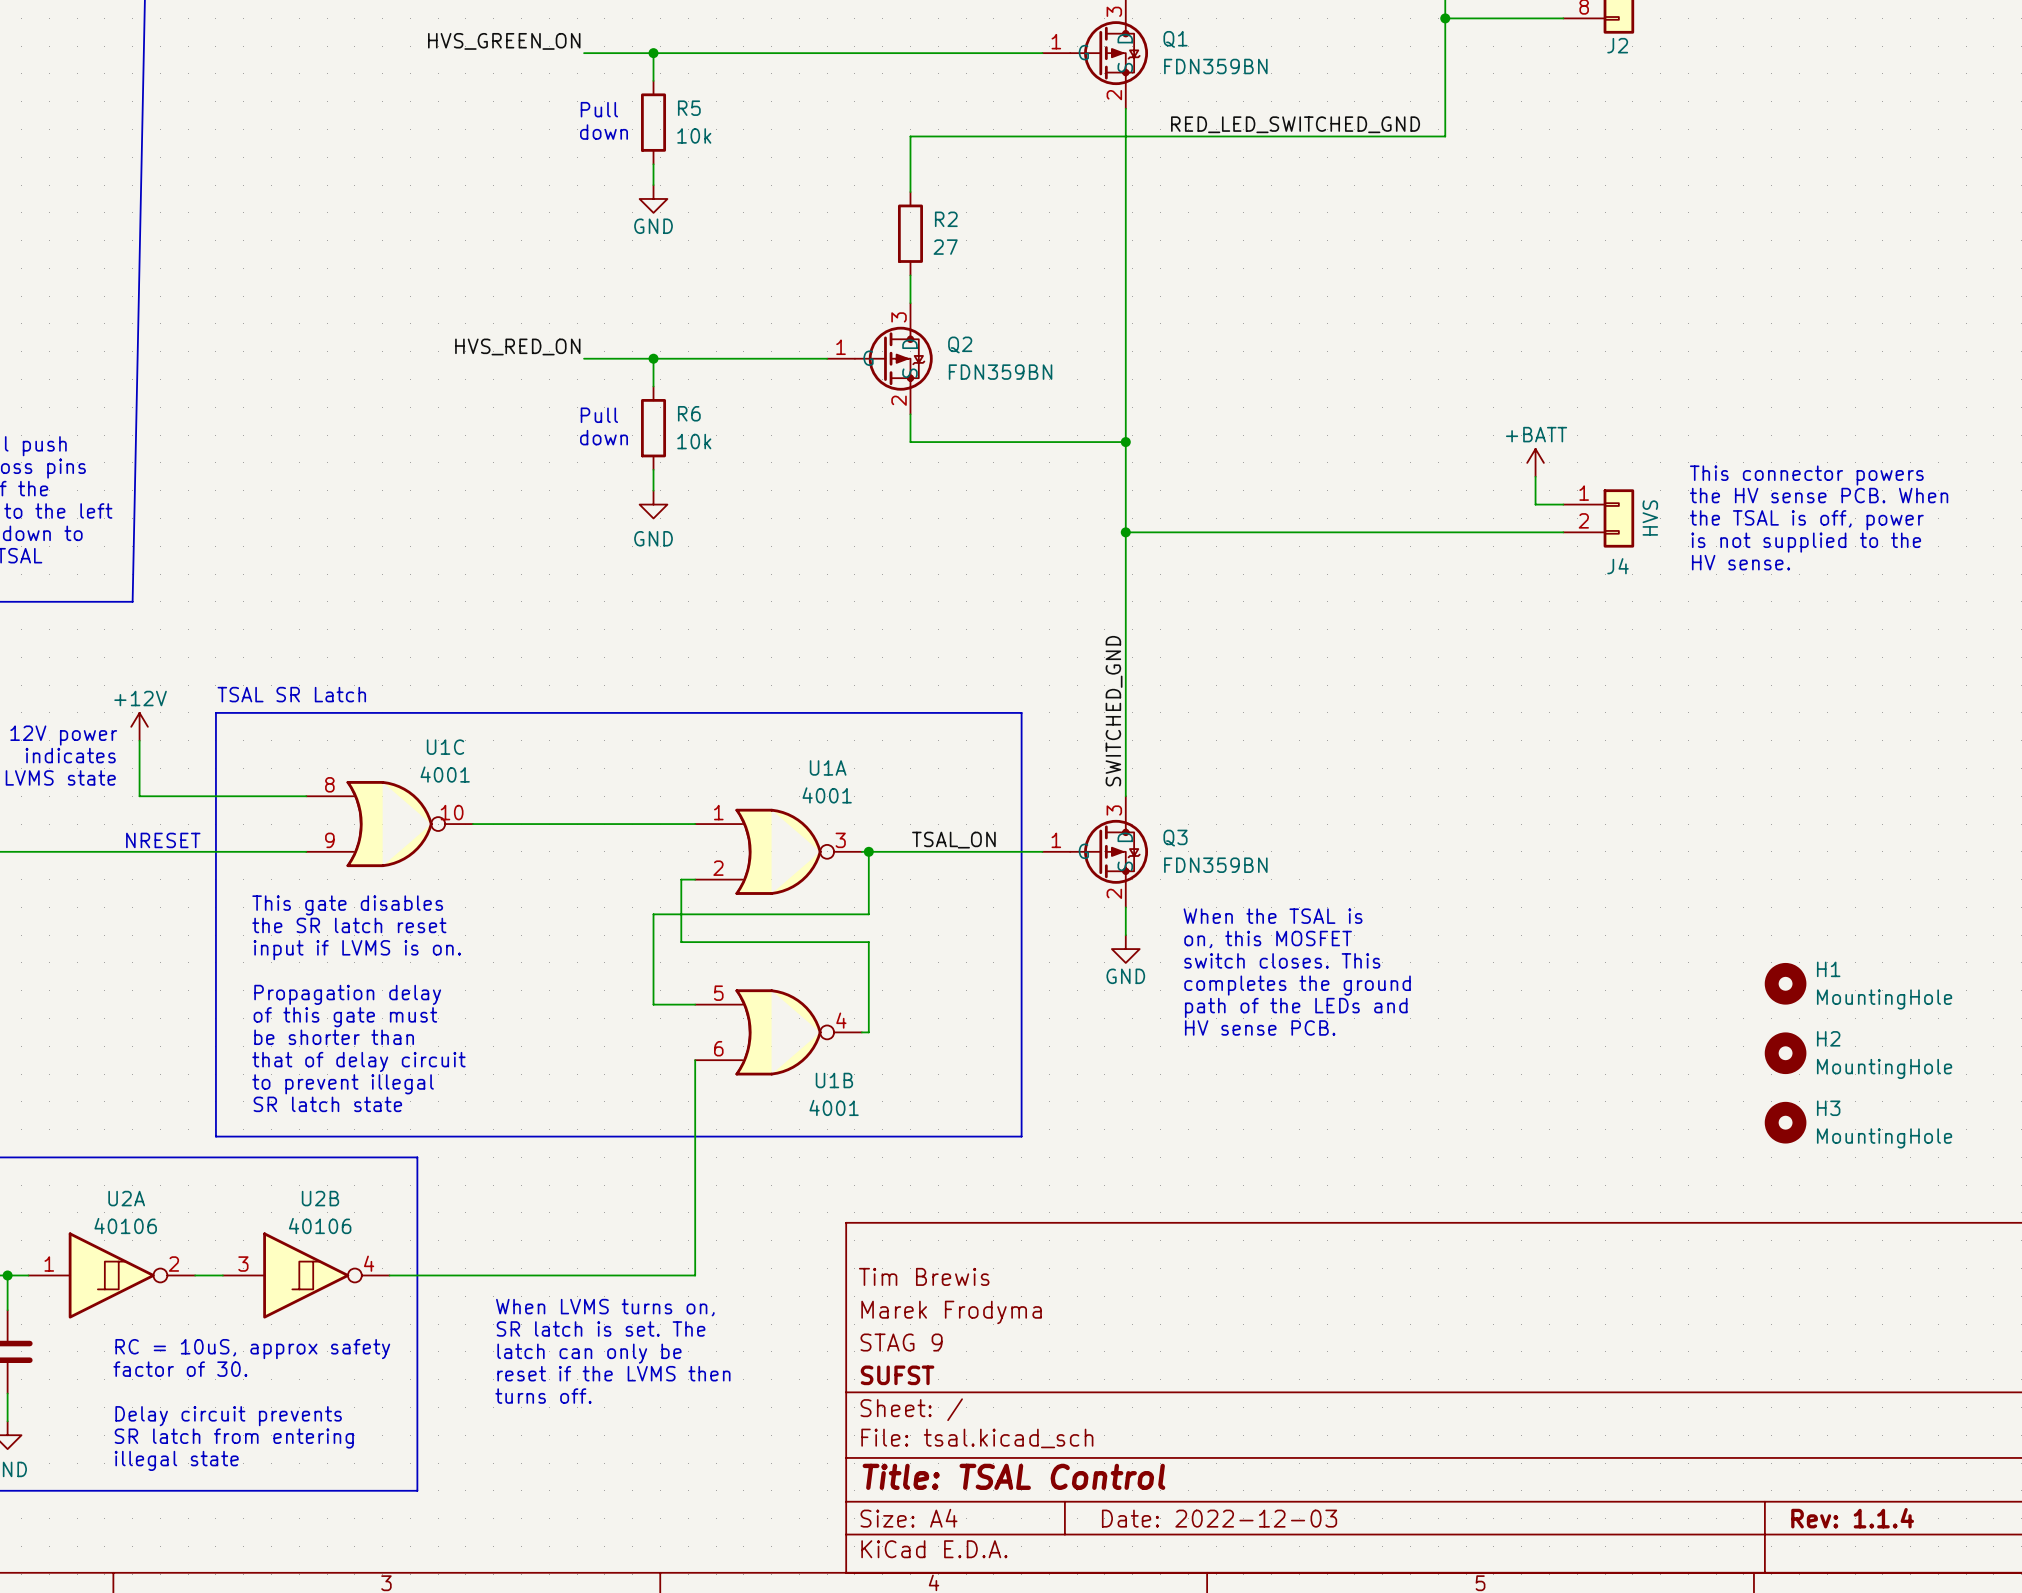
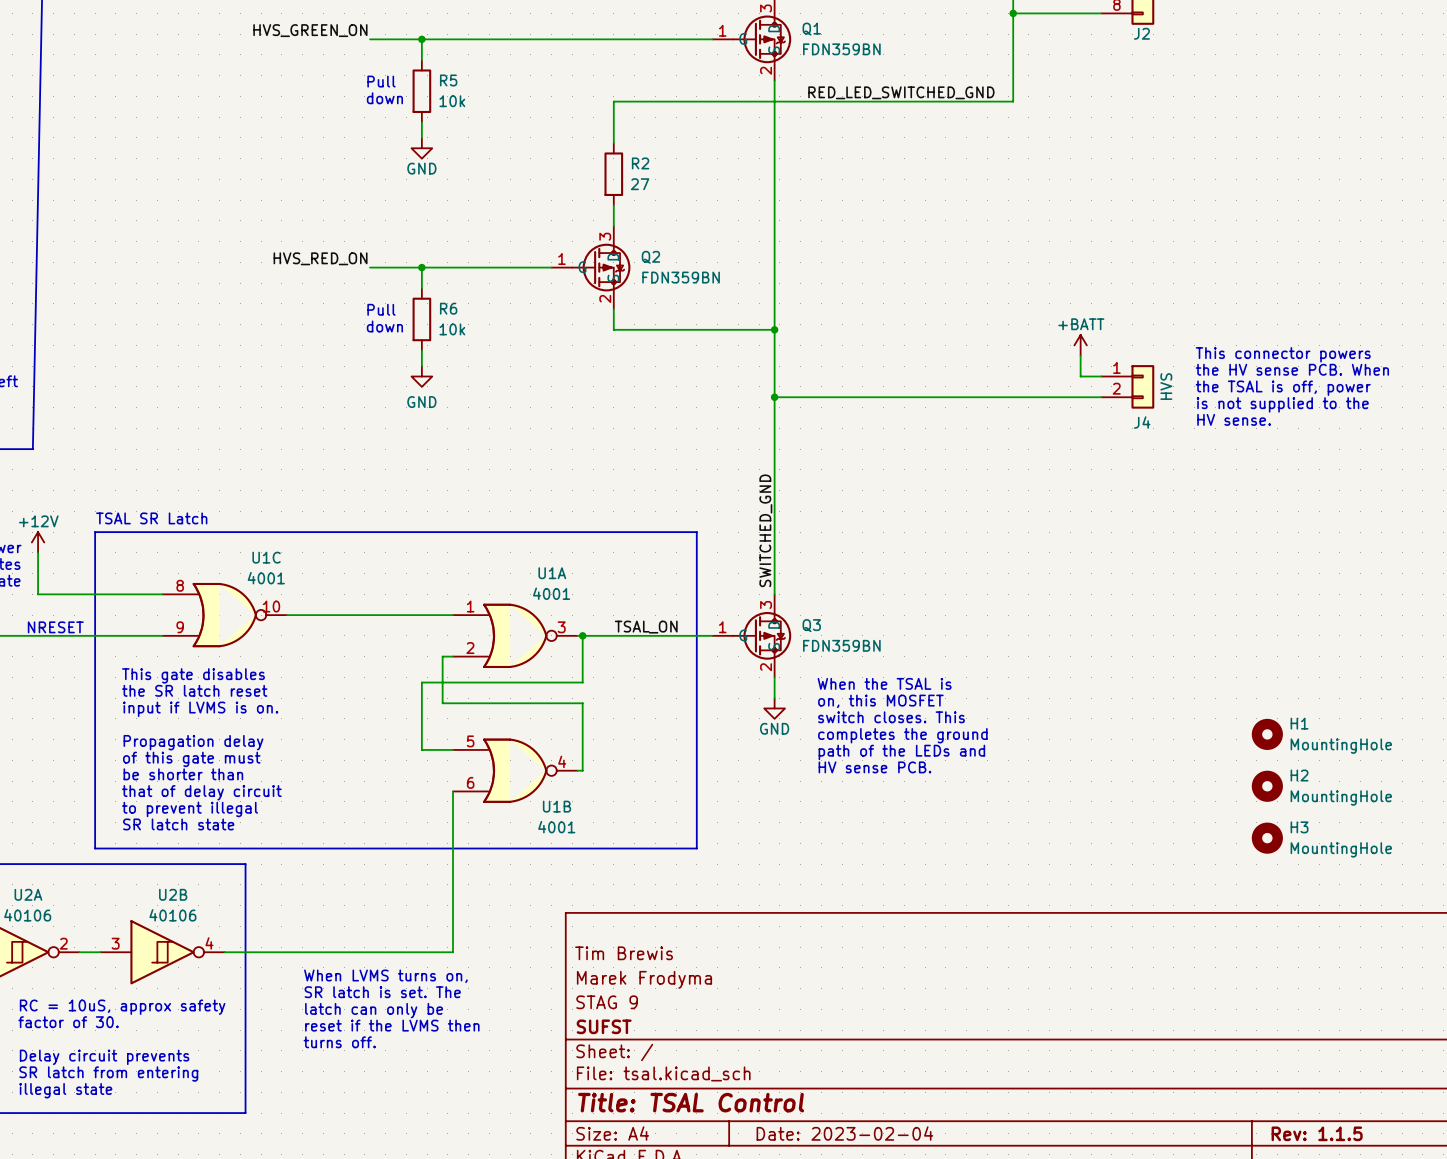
title block: Date: 2022-12-03 (1219, 1518) -> Date: 2023-02-04 (844, 1133)
title block: Rev: 1.1.4 (1852, 1518) -> Rev: 1.1.5 (1317, 1133)

